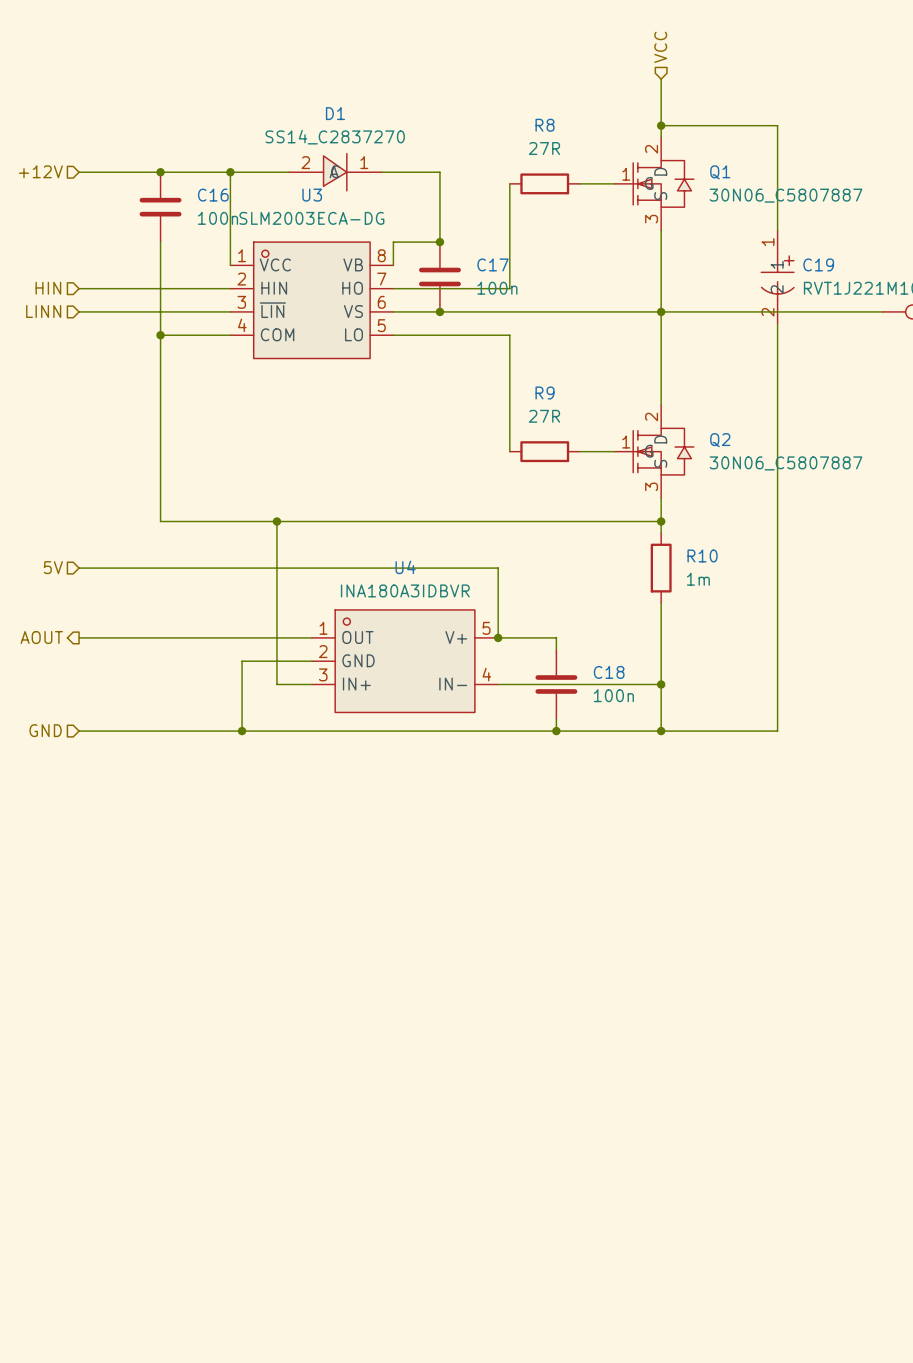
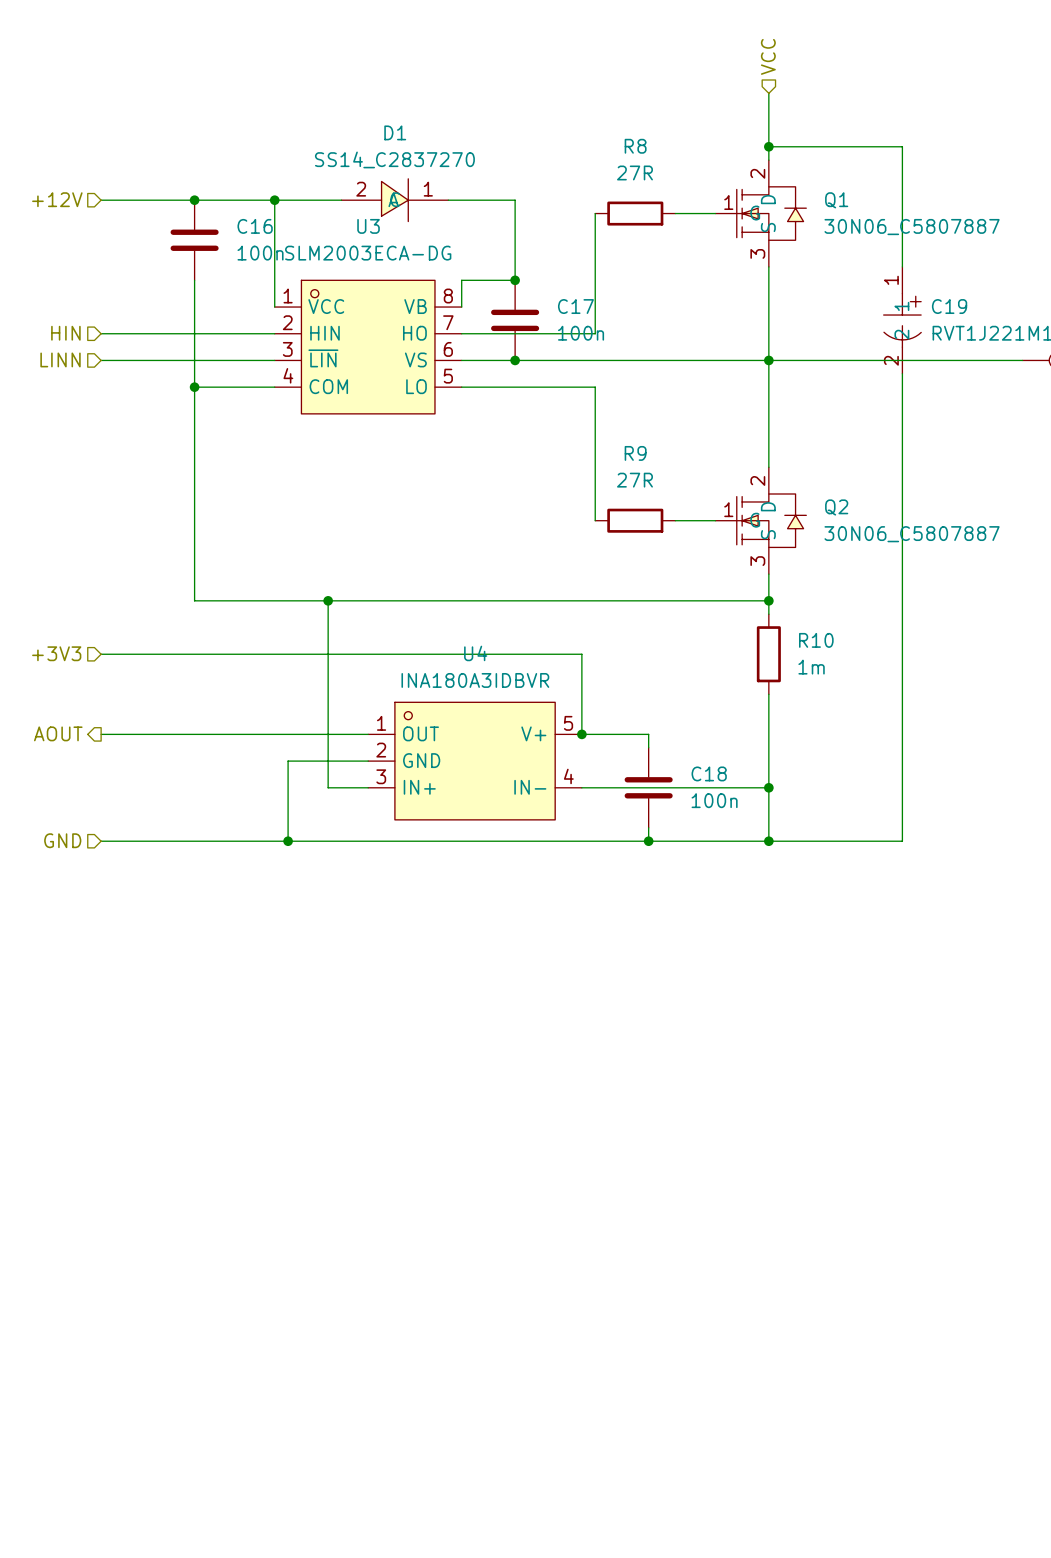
hierarchical label: 5V (53, 567) -> +3V3 (56, 653)

